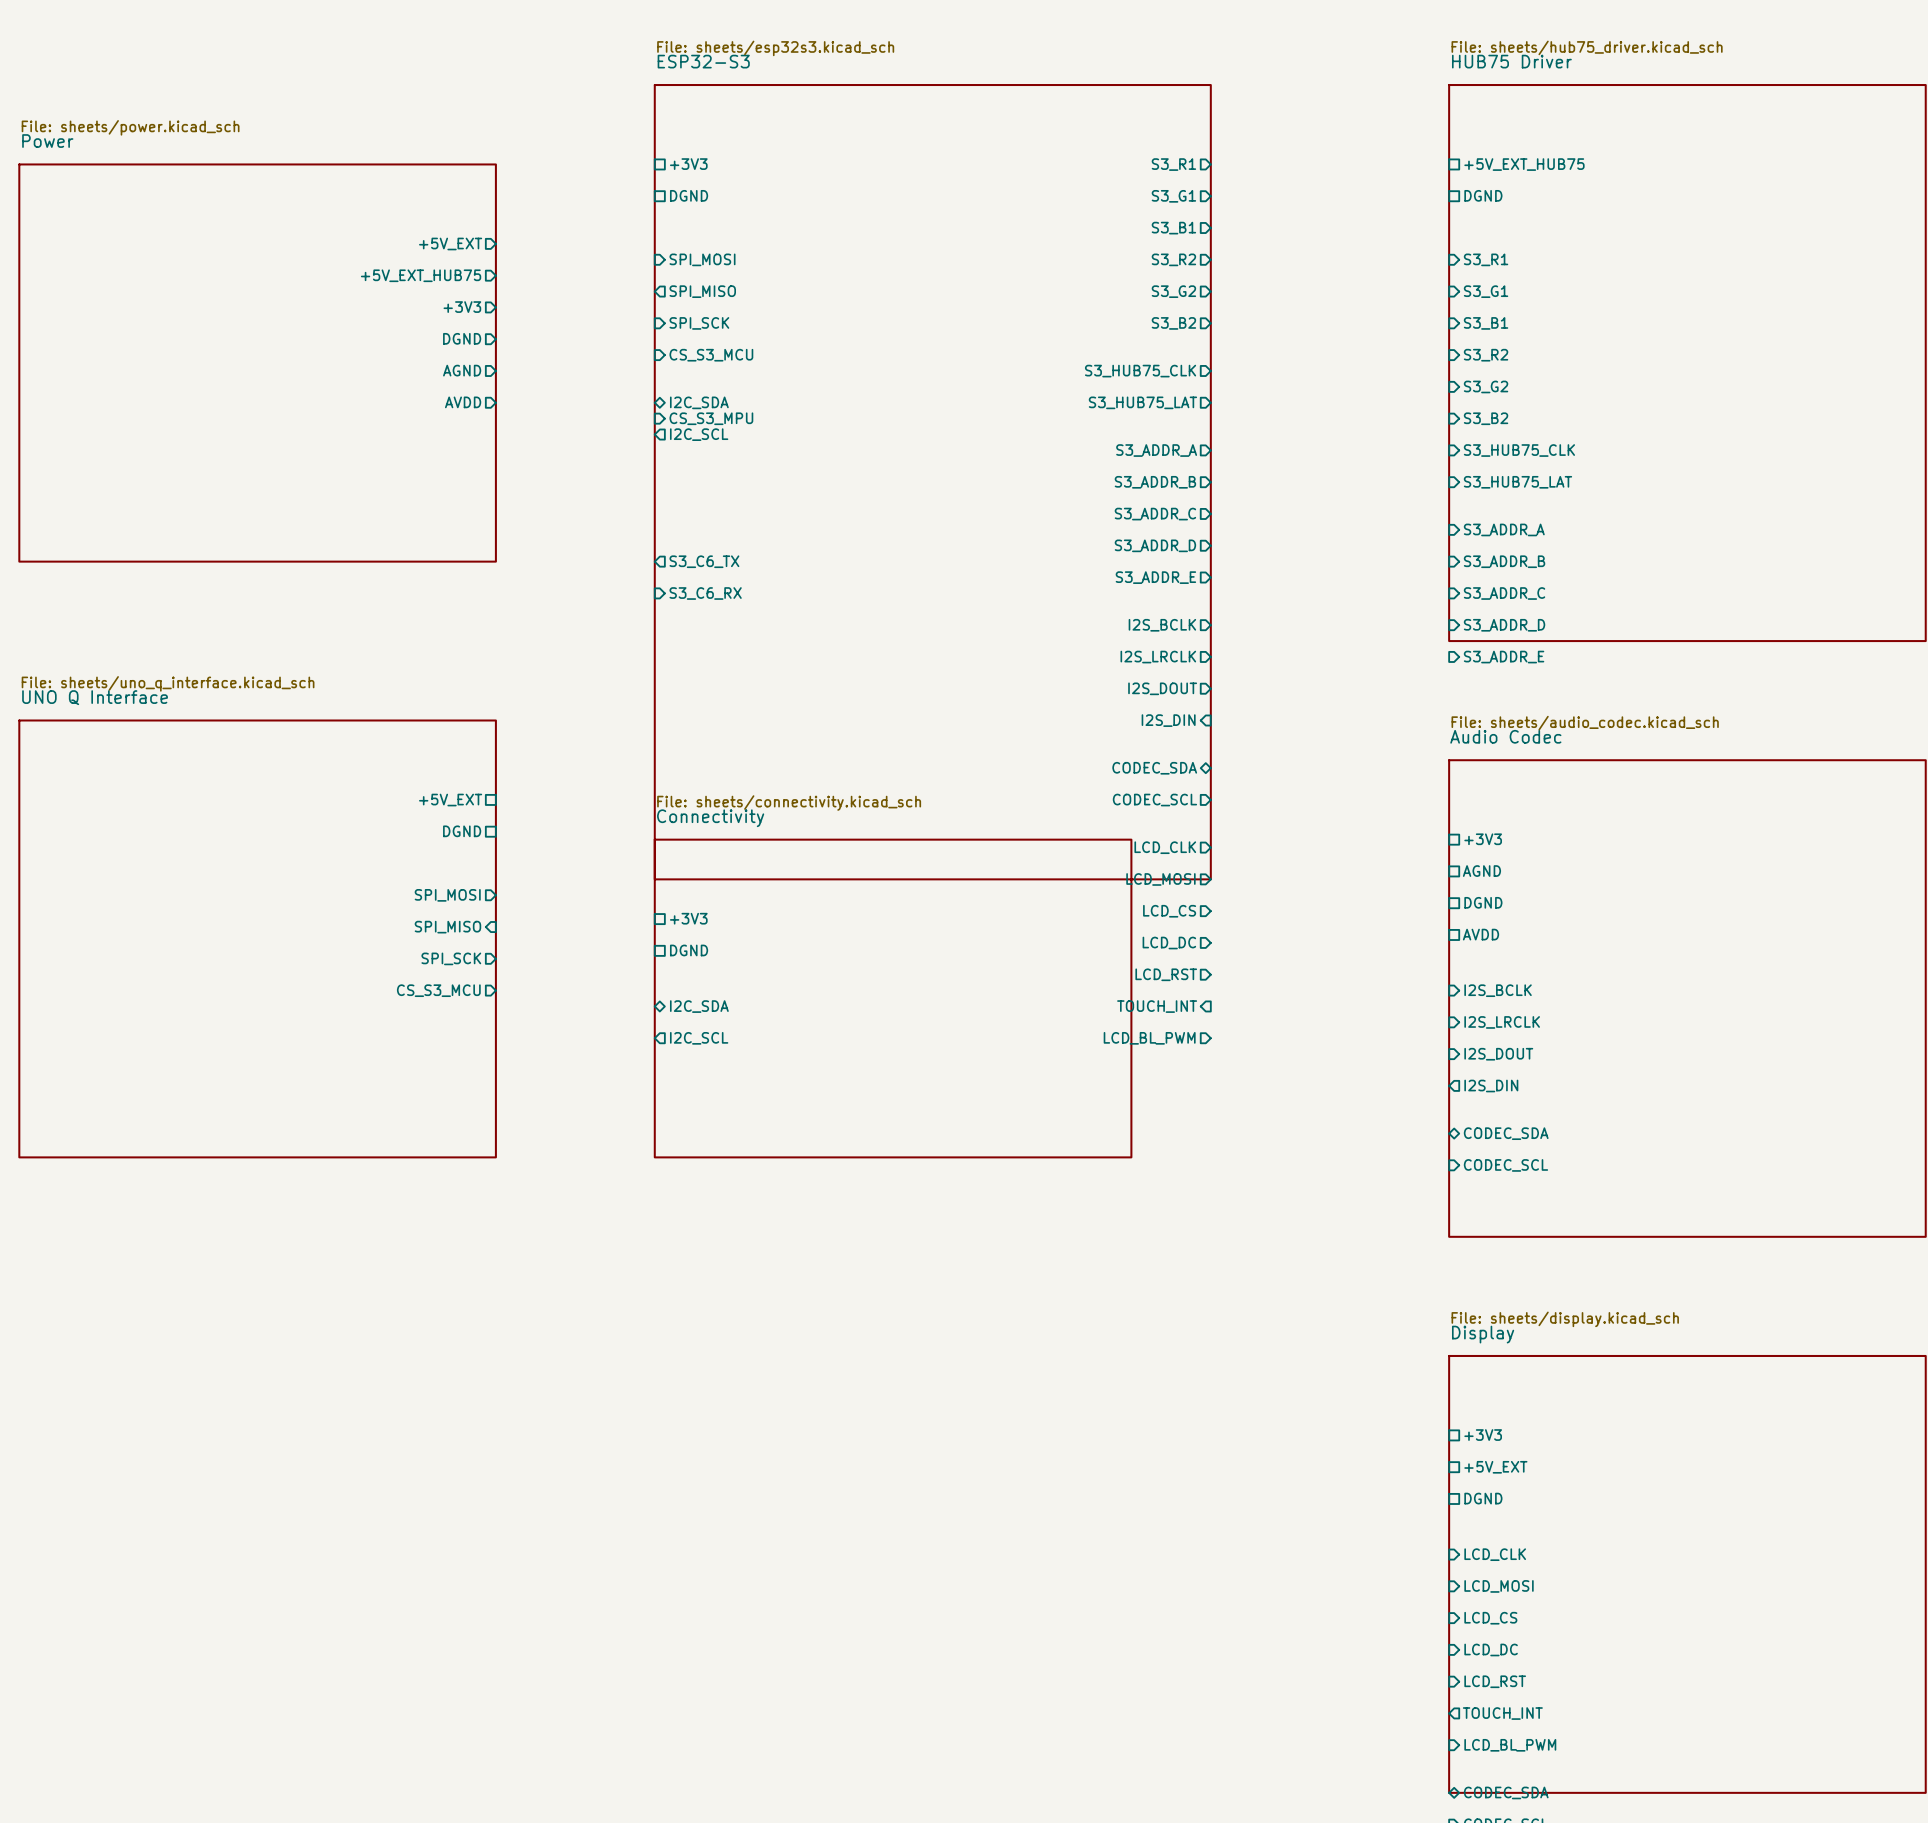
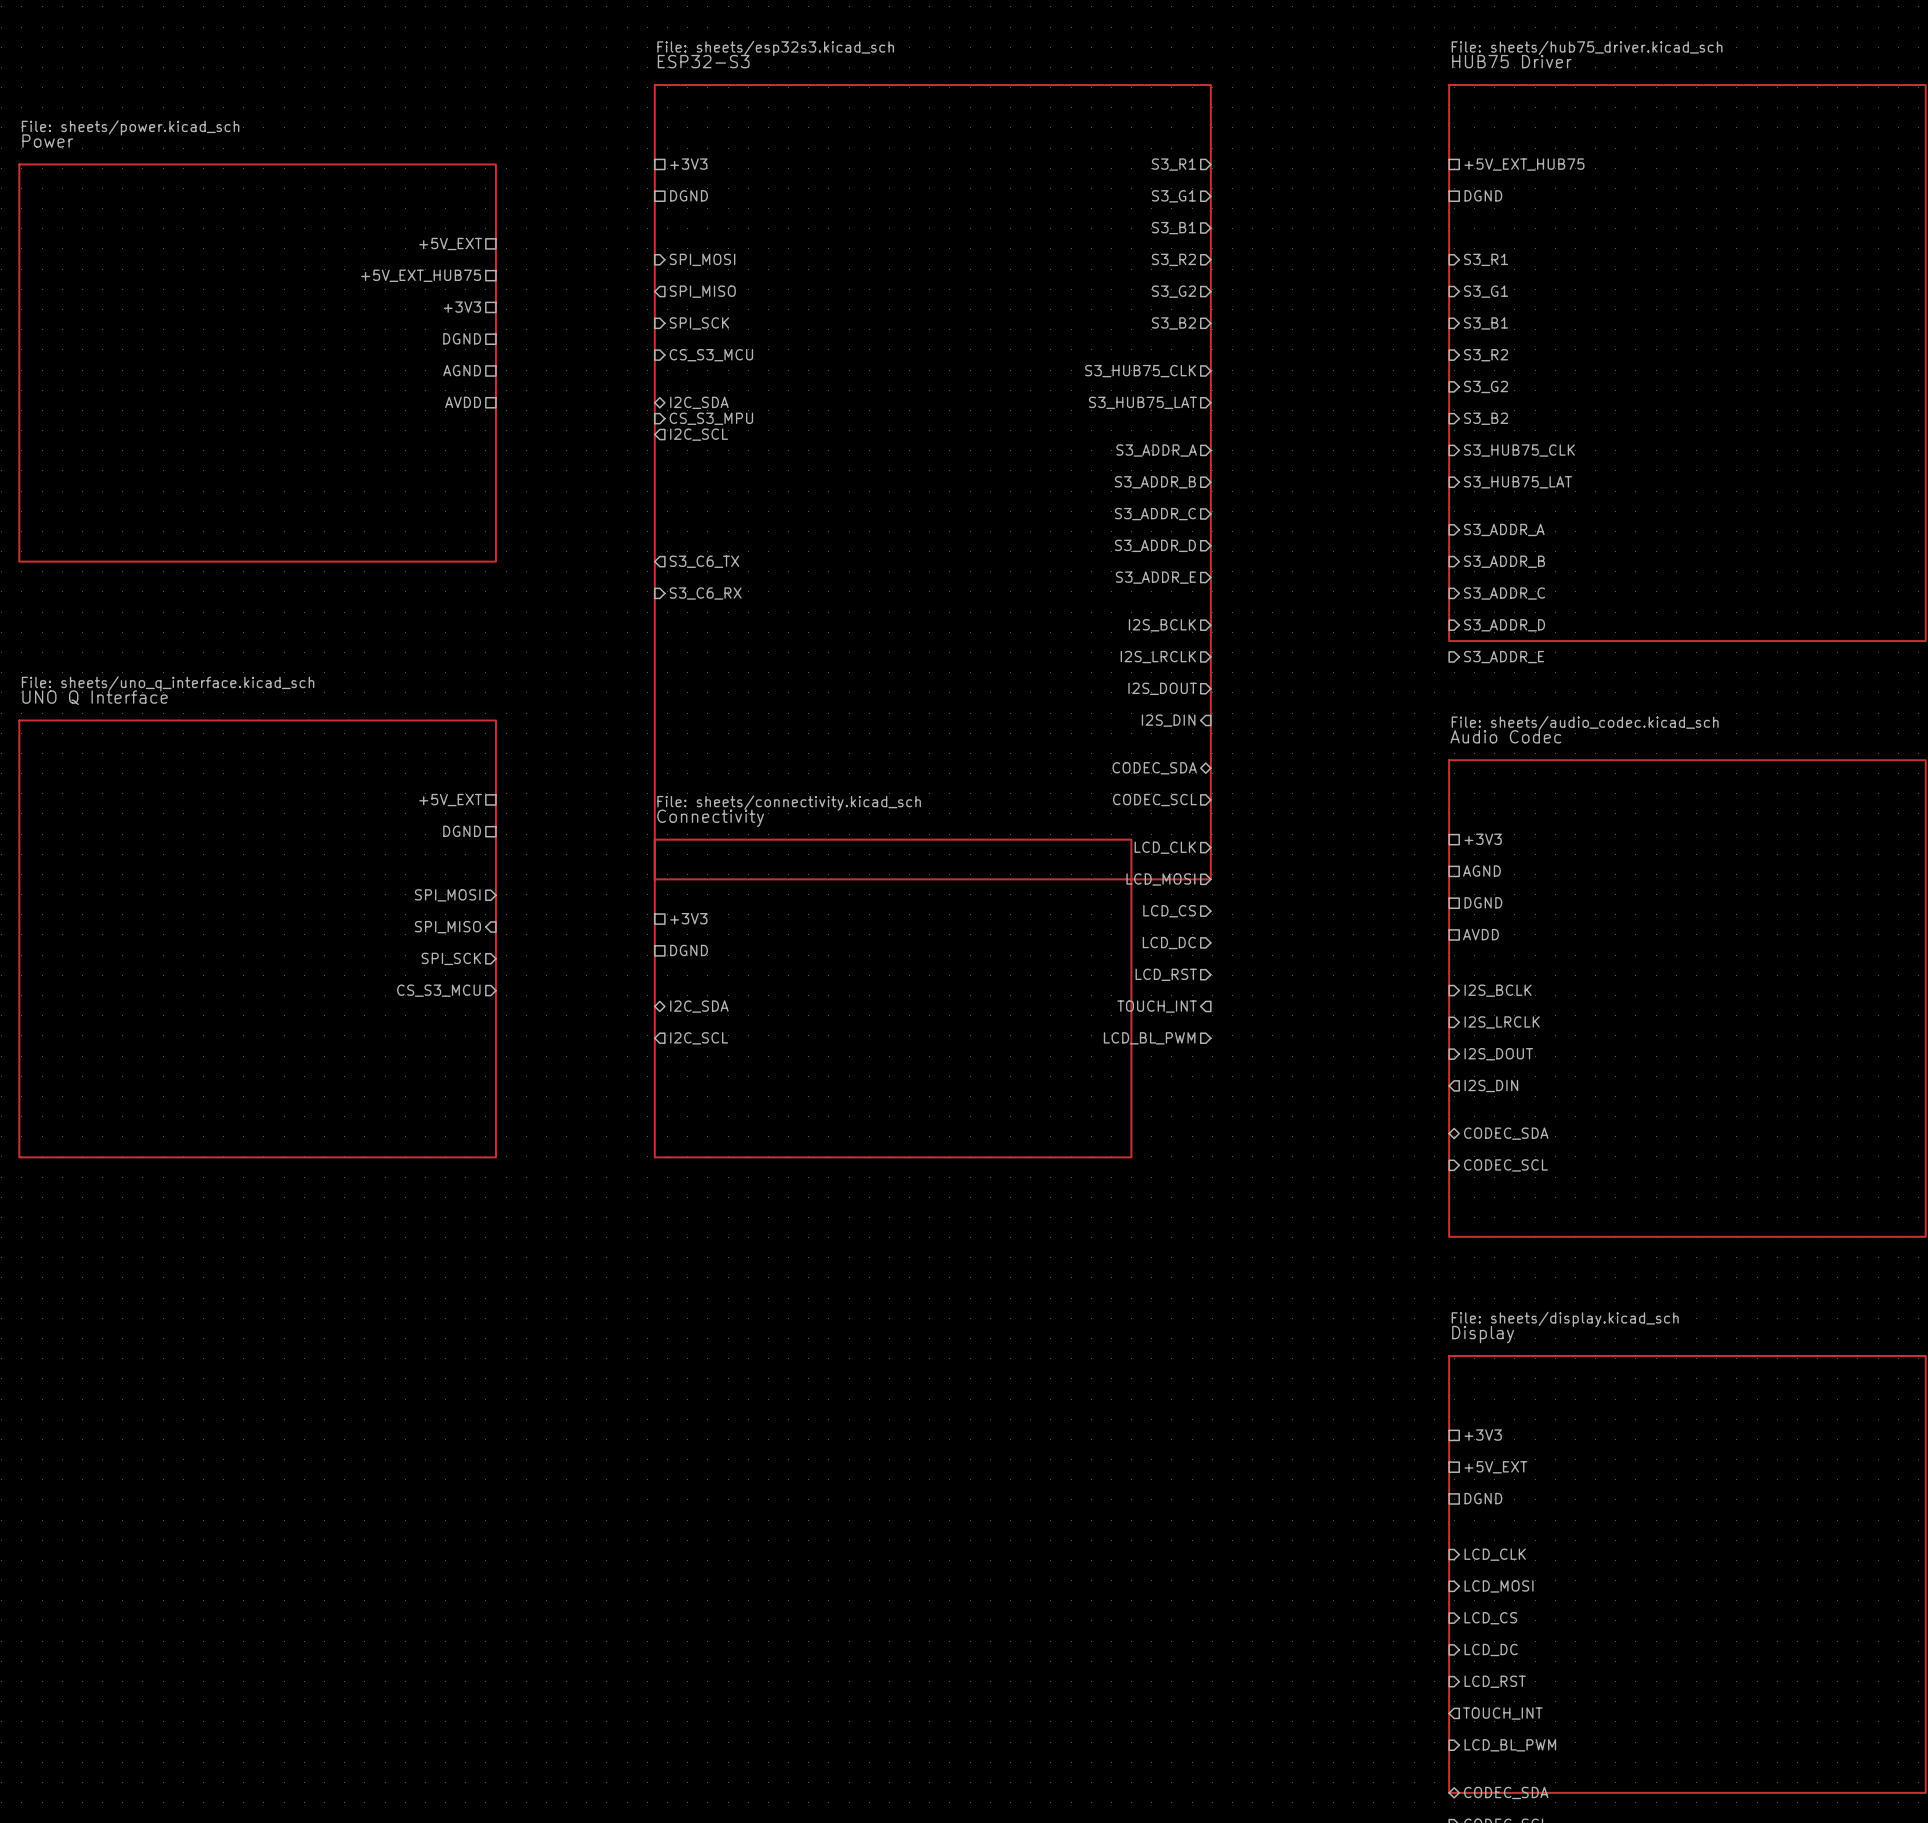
sheet pin shape: output (450, 243) -> passive (450, 243)
sheet pin shape: output (421, 275) -> passive (421, 275)
sheet pin shape: output (462, 307) -> passive (462, 307)
sheet pin shape: output (462, 338) -> passive (462, 338)
sheet pin shape: output (462, 370) -> passive (462, 370)
sheet pin shape: output (463, 402) -> passive (463, 402)

